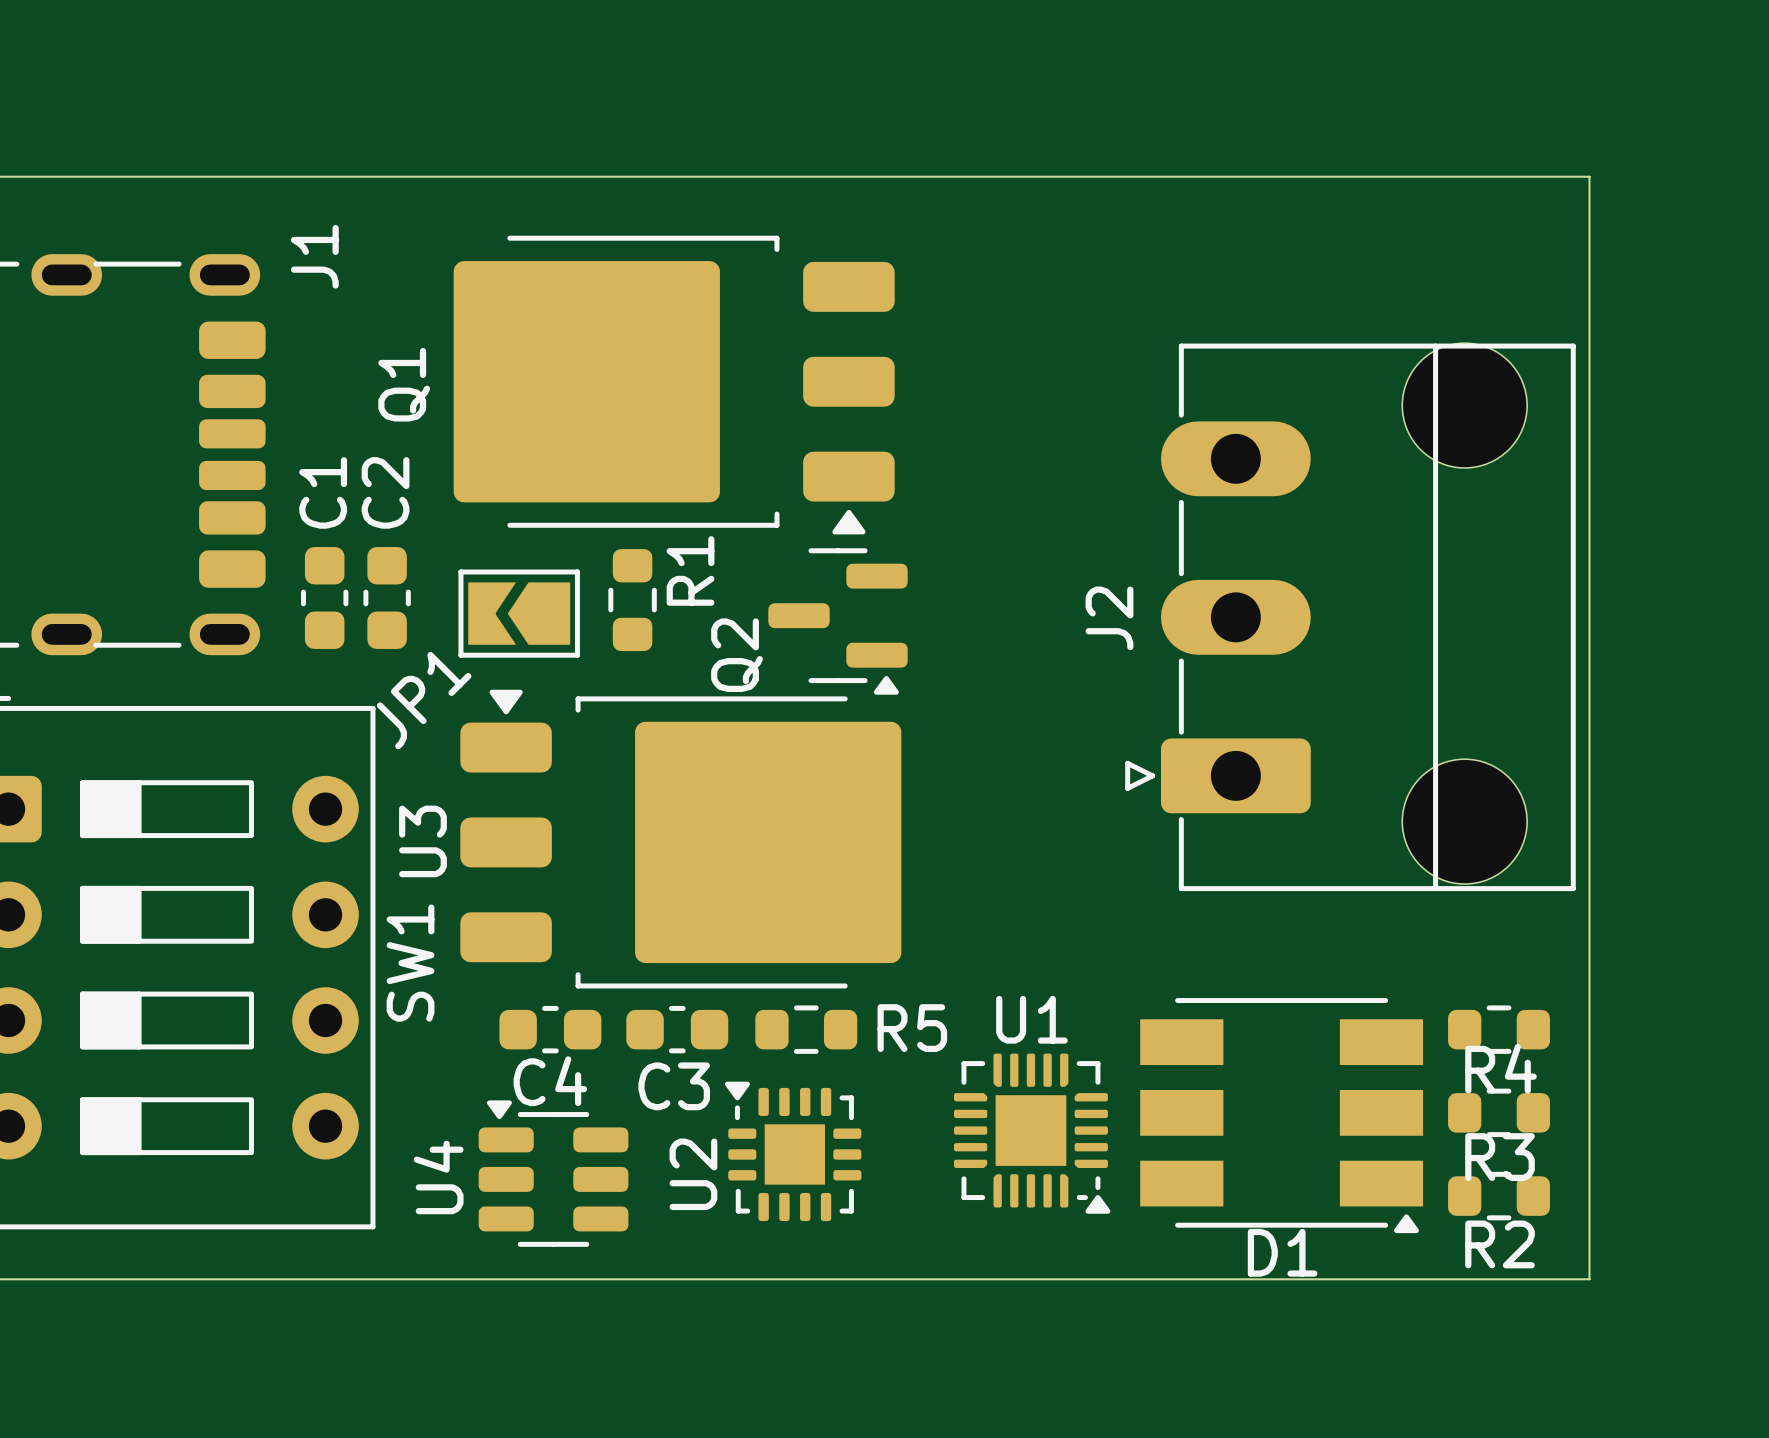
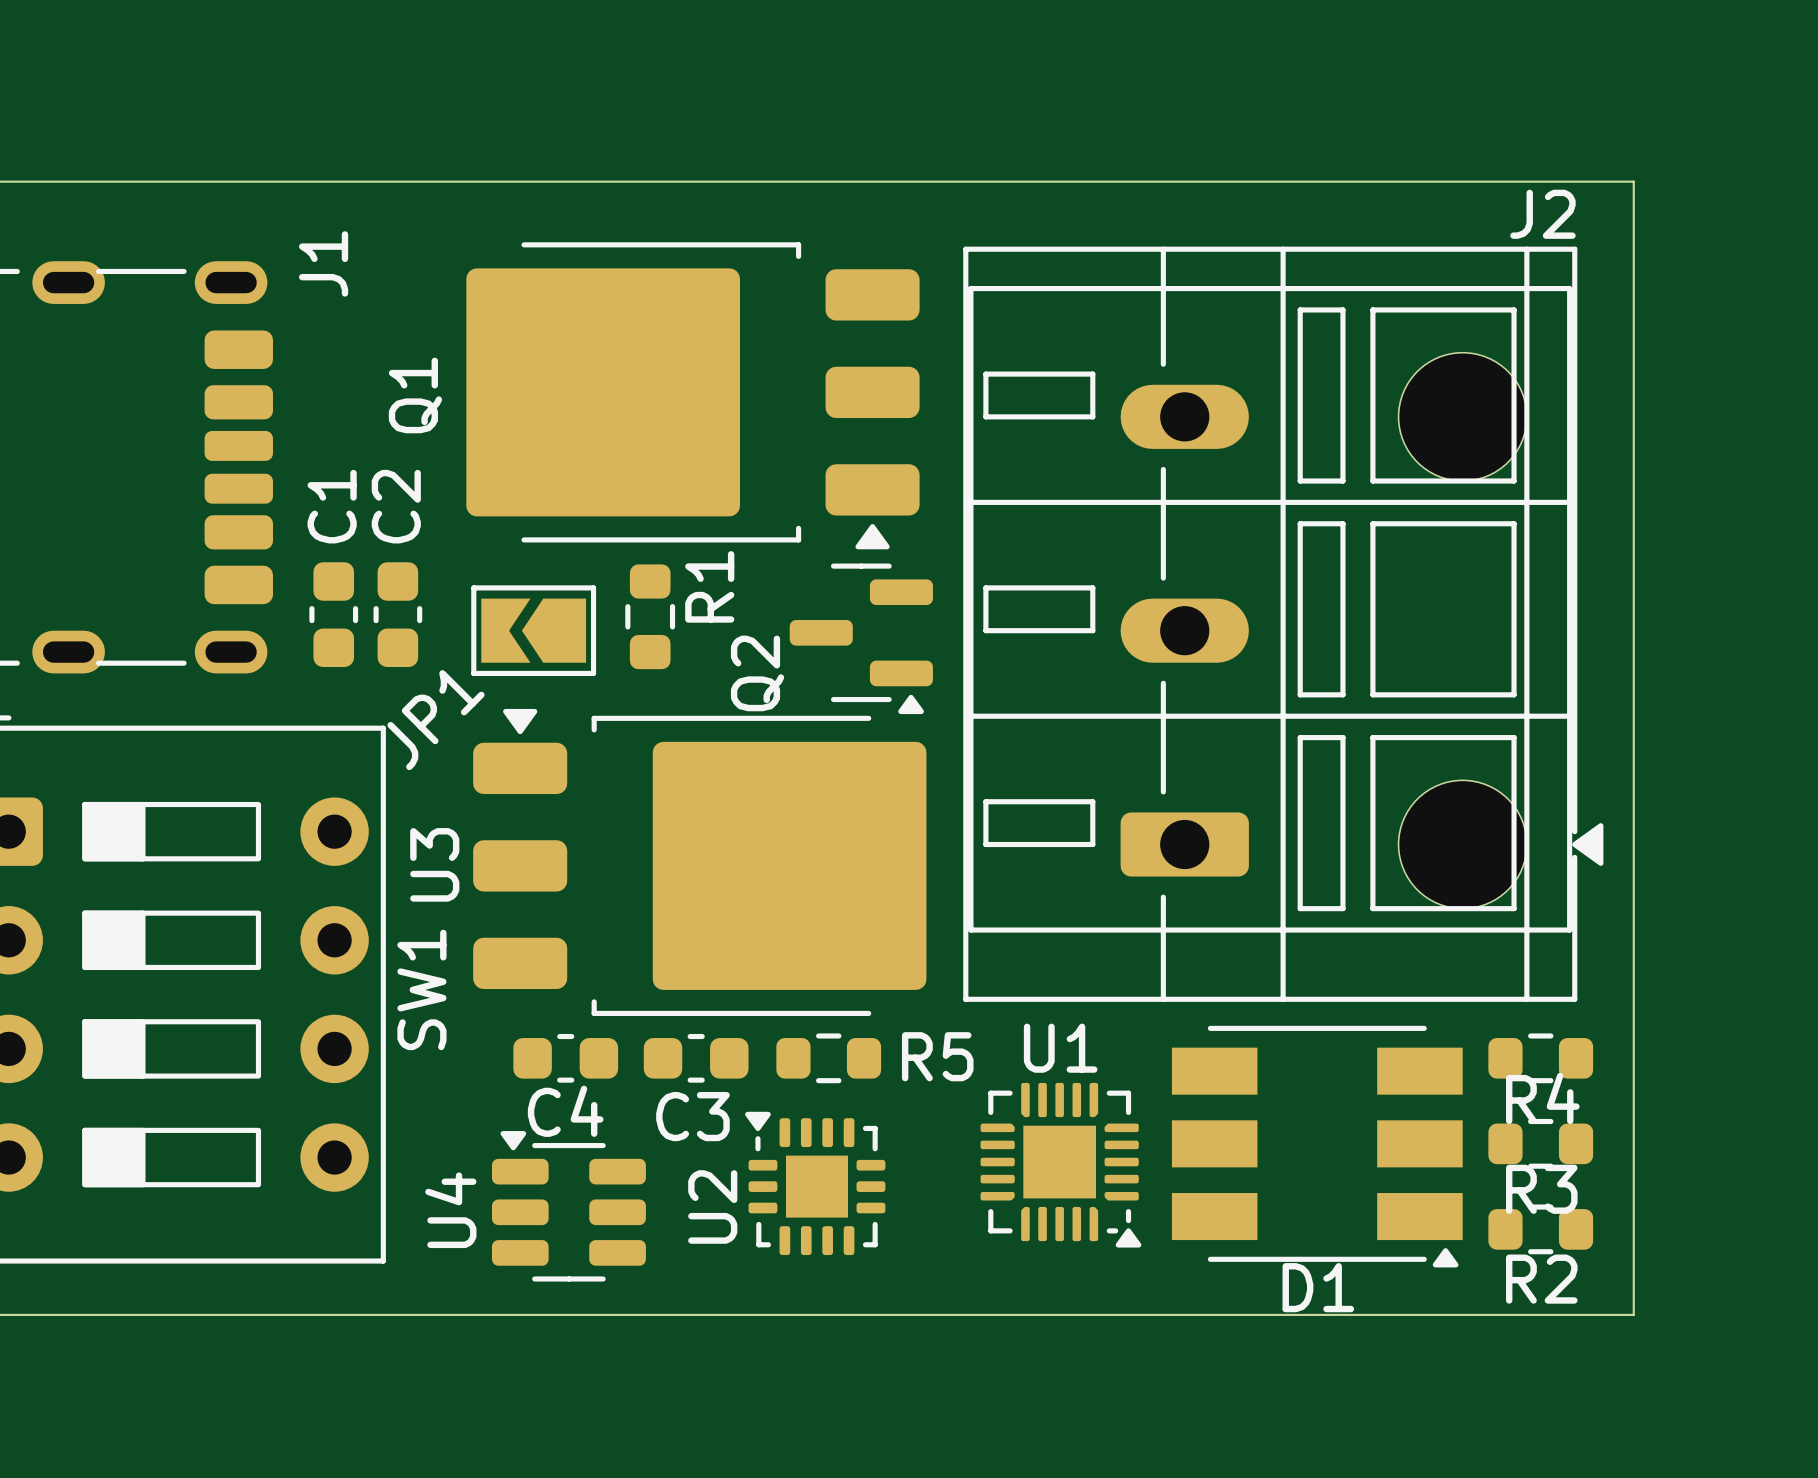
J2 footprint: [1125, 343, 1576, 892] -> [963, 246, 1604, 1002]
part position: (1464, 405) -> (1462, 416)
J2 name position: J2 (1109, 618) -> J2 (1542, 214)
part position: (1464, 821) -> (1462, 844)

